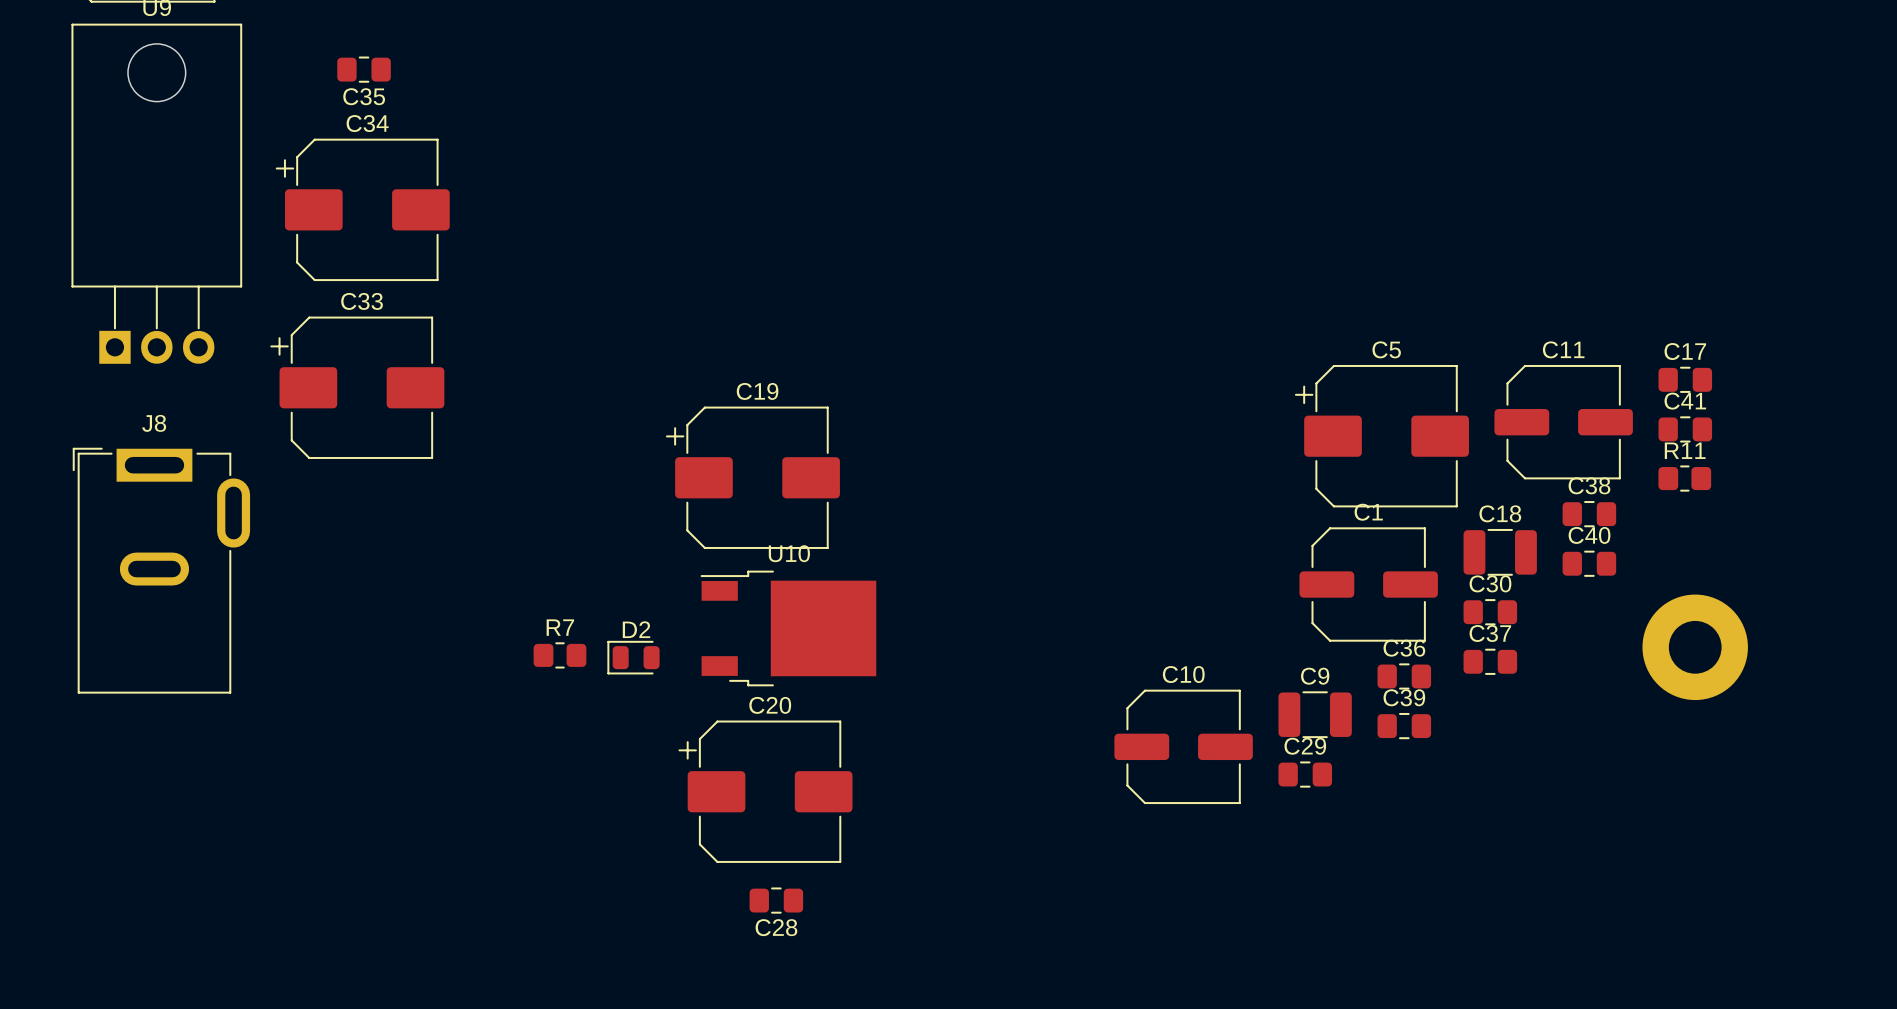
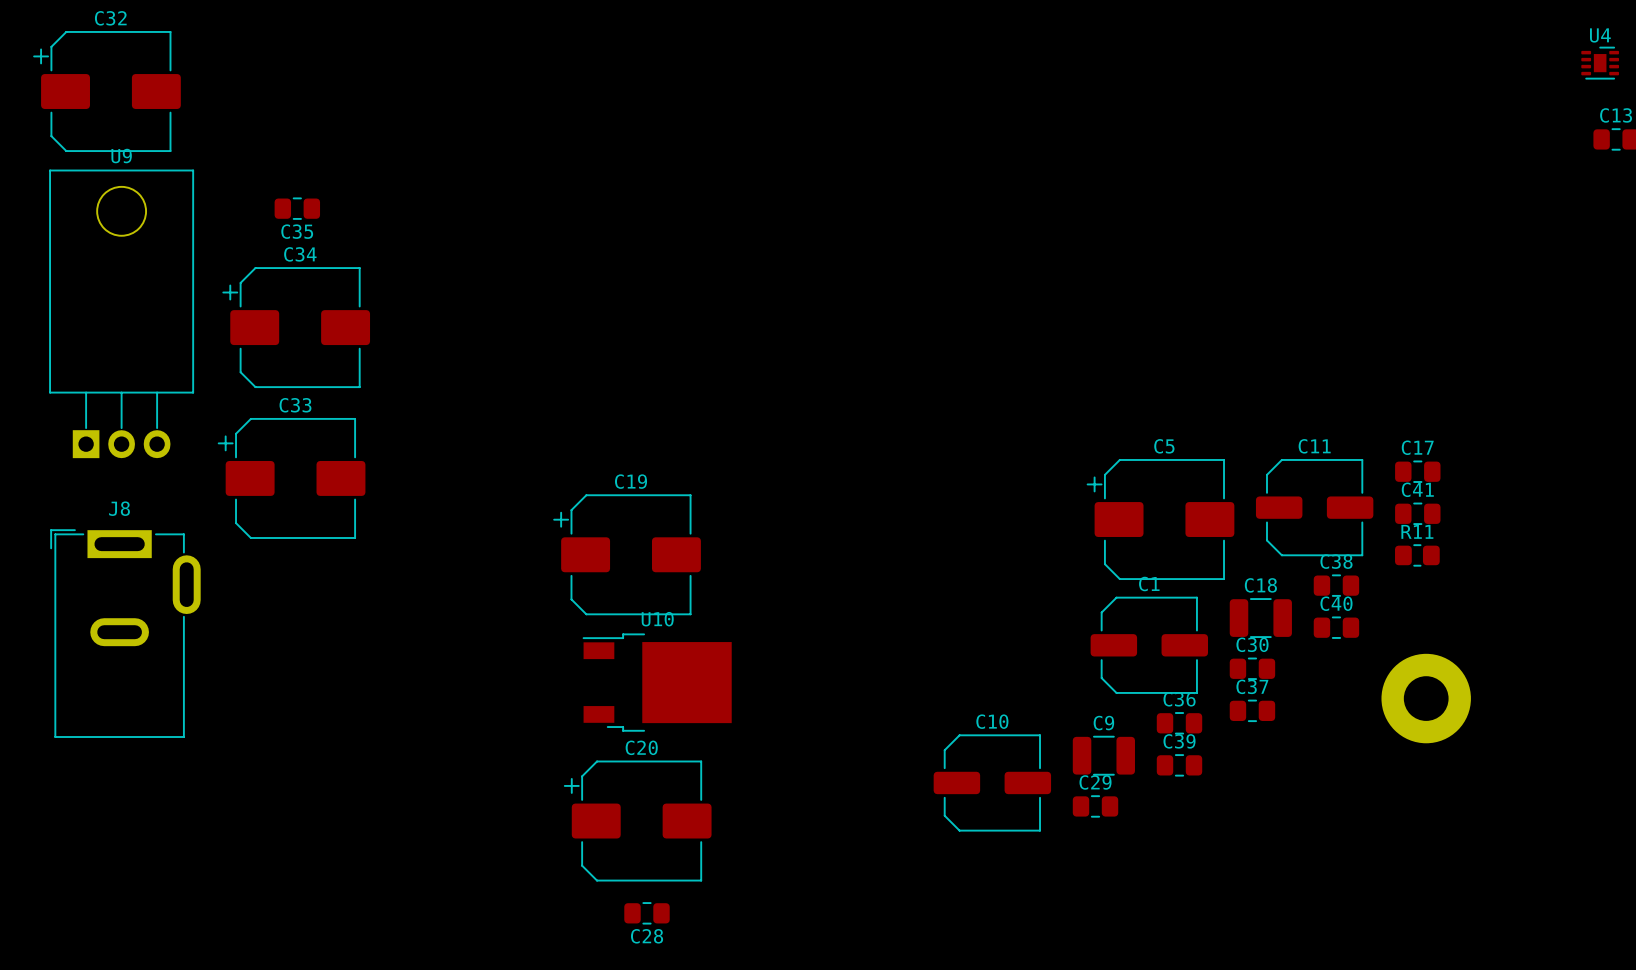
R7: (559, 655) -> none
D2: (633, 657) -> none

